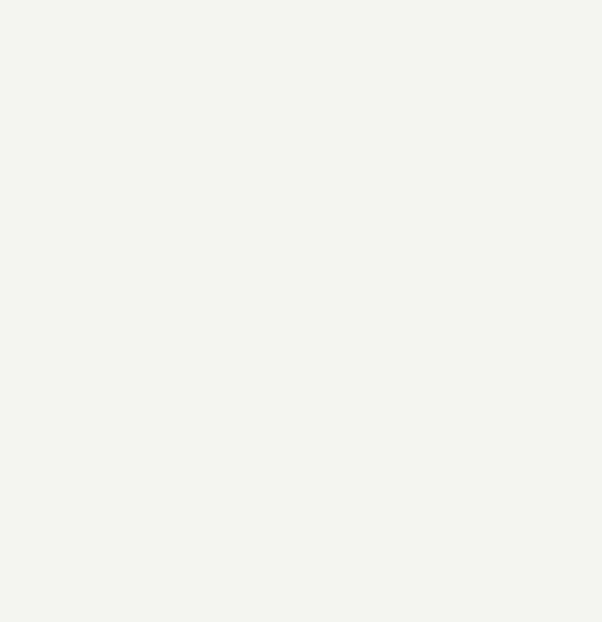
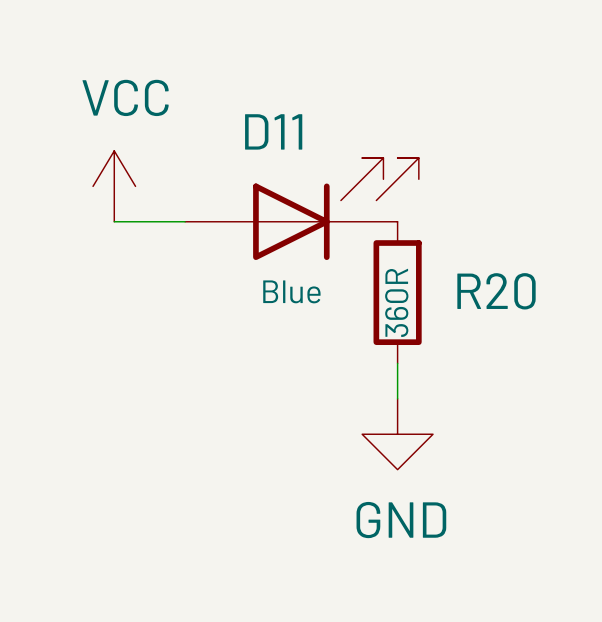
power symbol: none -> VCC (114, 186)
D11: none -> Blue (301, 209)
wire: none -> (114, 221) (185, 221)
R20: none -> 360R (397, 292)
wire: none -> (397, 363) (397, 398)
power symbol: none -> GND (397, 434)

